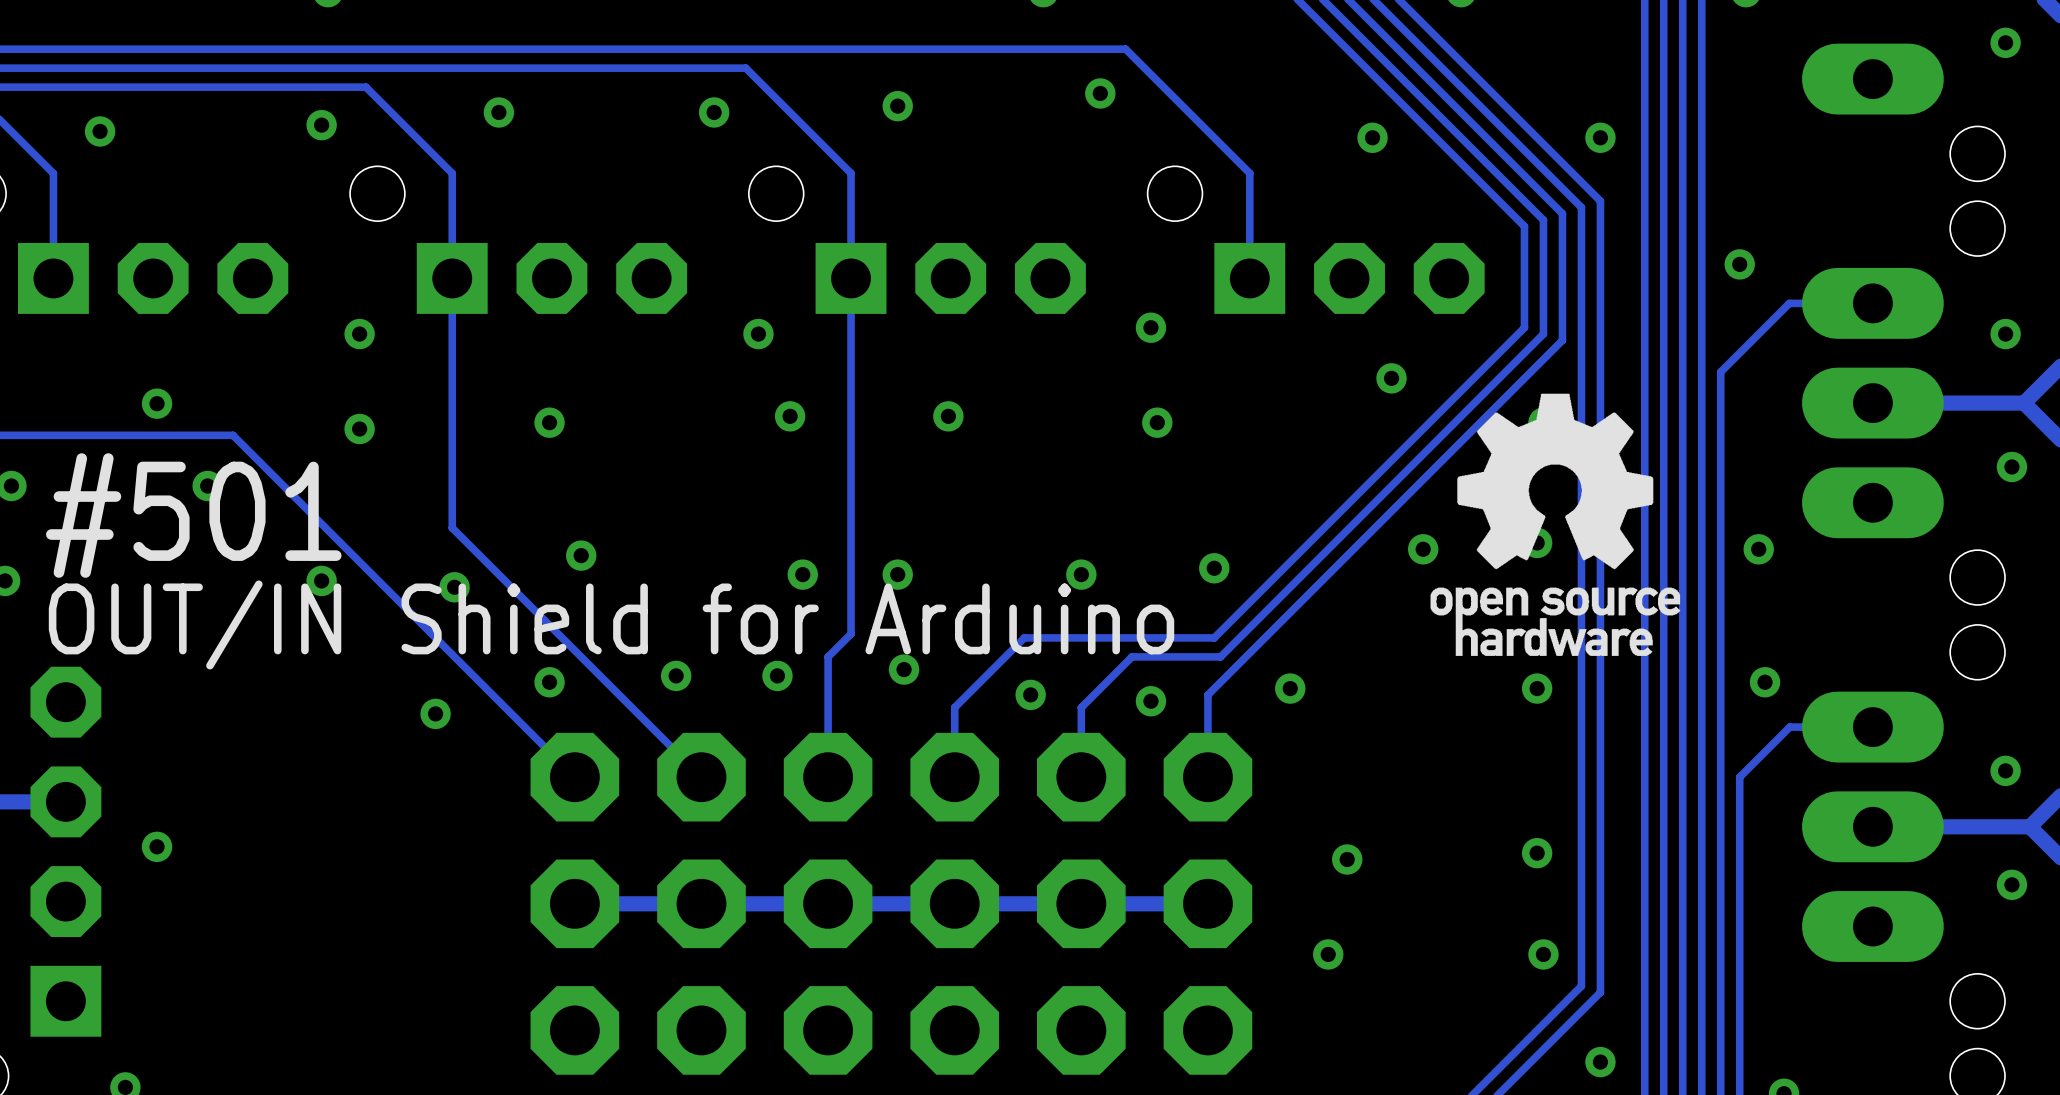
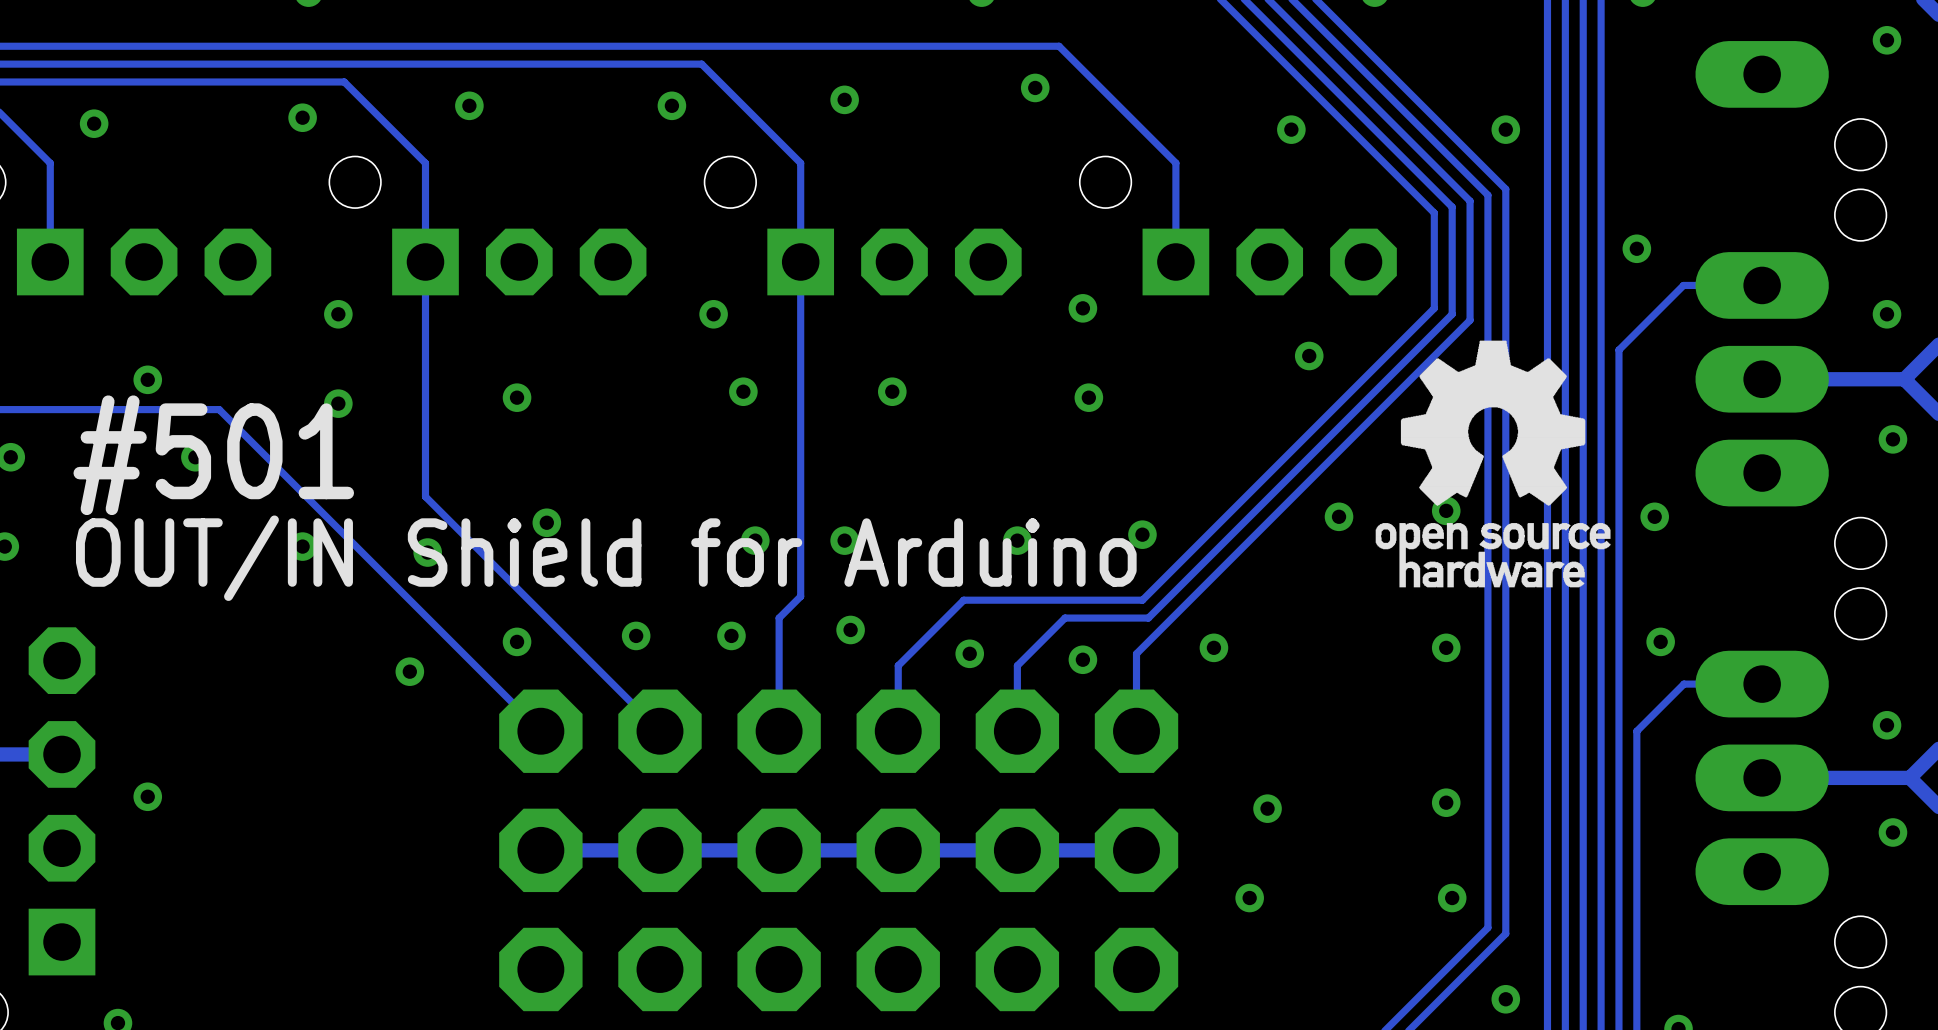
text position: #501 (193, 515) -> #501 (213, 455)
drawing position: (1555, 524) -> (1493, 463)
text position: OUT/IN Shield for Arduino (611, 624) -> OUT/IN Shield for Arduino (606, 558)

